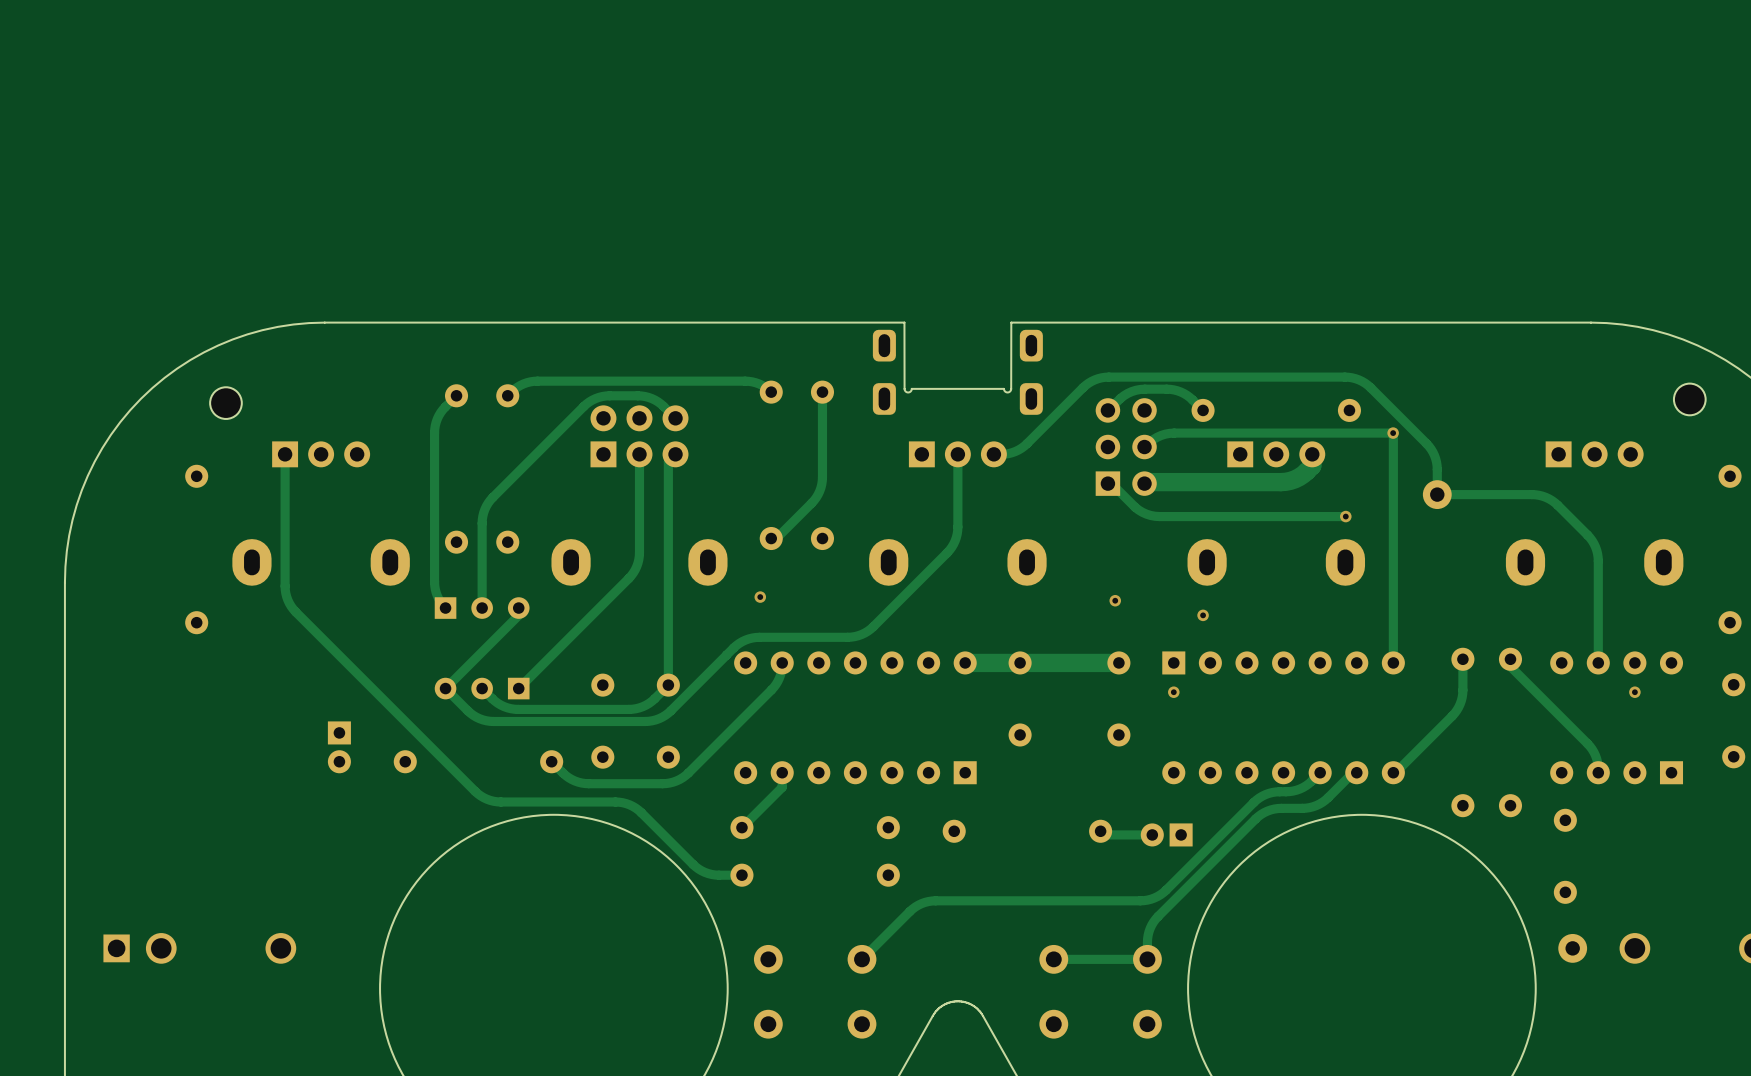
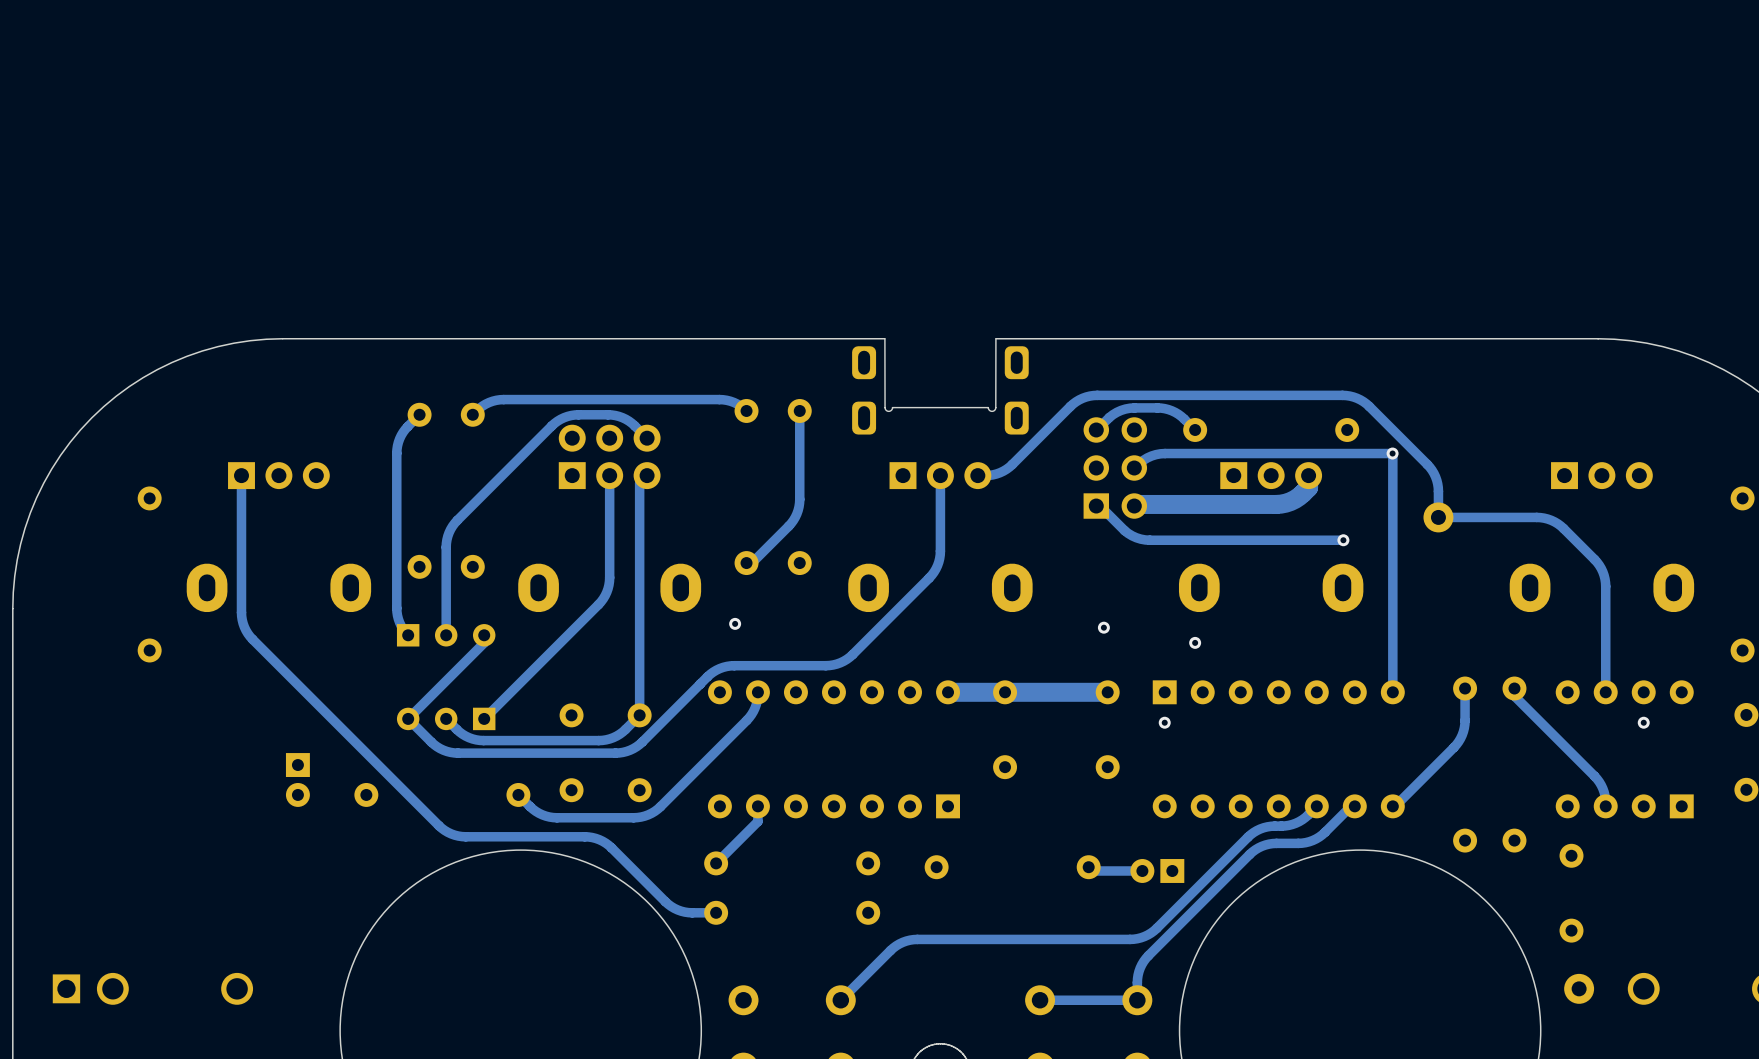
part: (1689, 399) -> none
part: (225, 403) -> none

